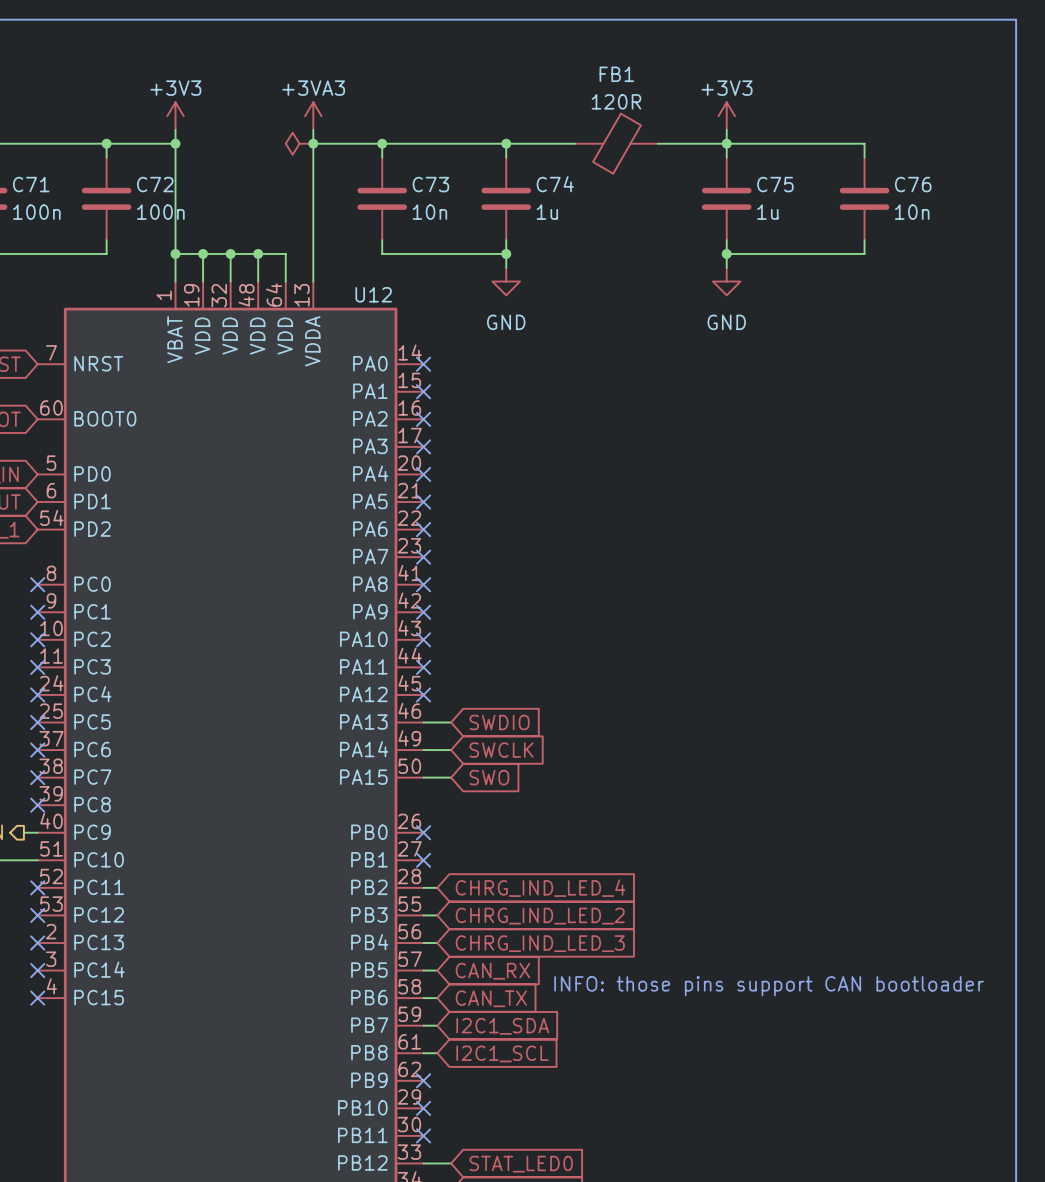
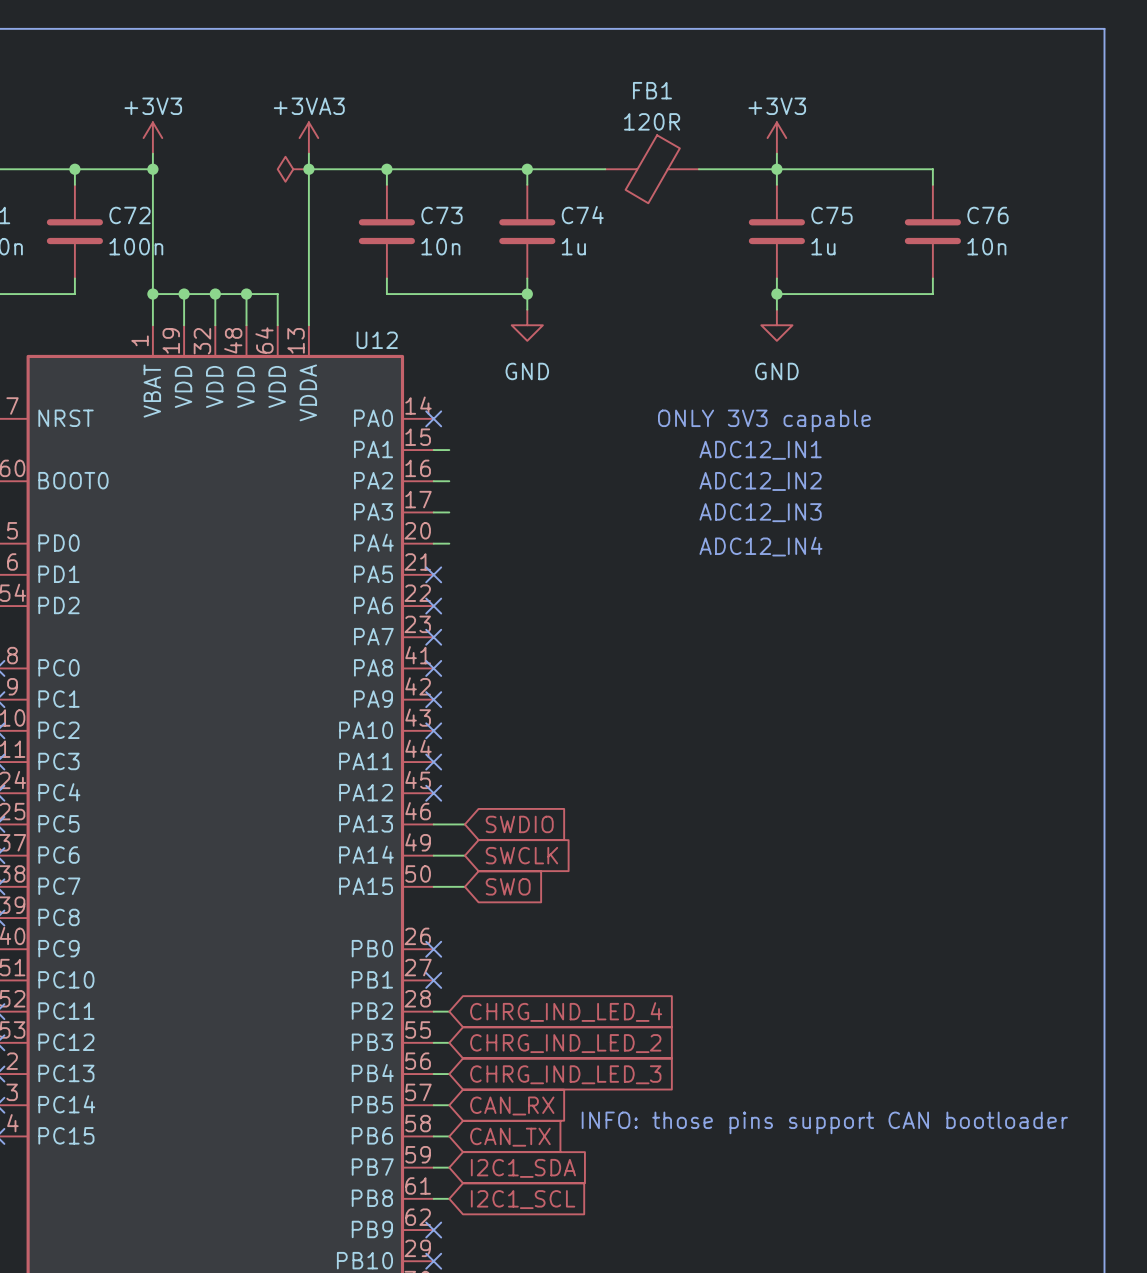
text: none -> ONLY 3V3 capable (764, 420)
wire: none -> (433, 450) (449, 450)
no-connect mark: (423, 391) -> none
text: none -> ADC12_IN1 (760, 450)
wire: none -> (433, 481) (449, 481)
no-connect mark: (423, 419) -> none
text: none -> ADC12_IN2 (760, 481)
wire: none -> (433, 512) (449, 512)
no-connect mark: (423, 446) -> none
text: none -> ADC12_IN3 (760, 512)
wire: none -> (433, 543) (449, 543)
no-connect mark: (423, 474) -> none
text: none -> ADC12_IN4 (760, 546)

